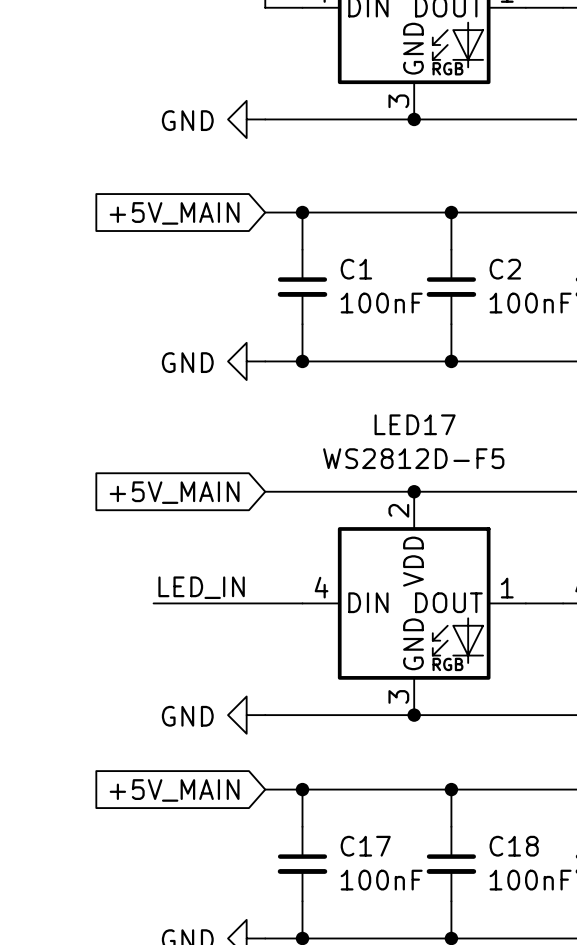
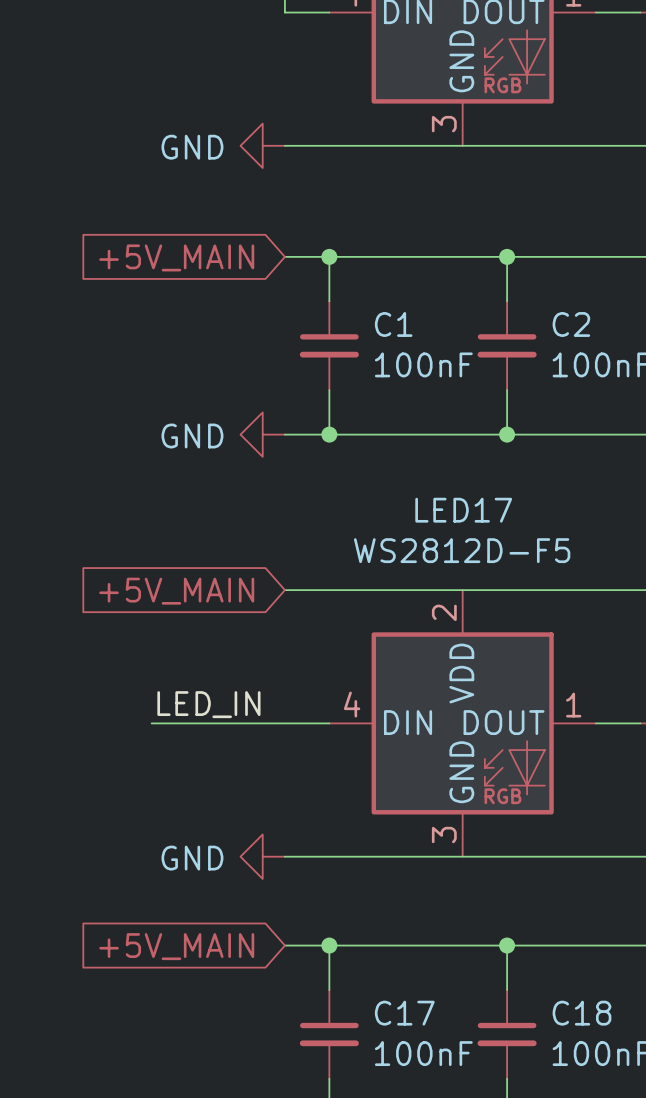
junction: (414, 119) -> none
junction: (414, 491) -> none
junction: (414, 715) -> none

